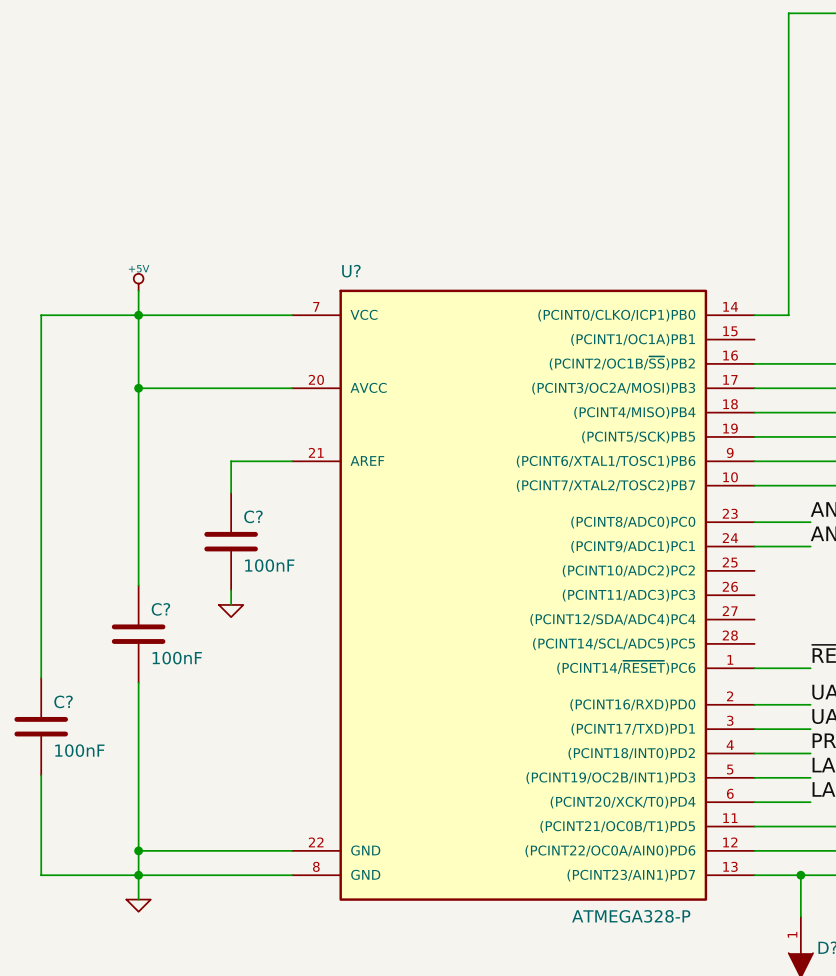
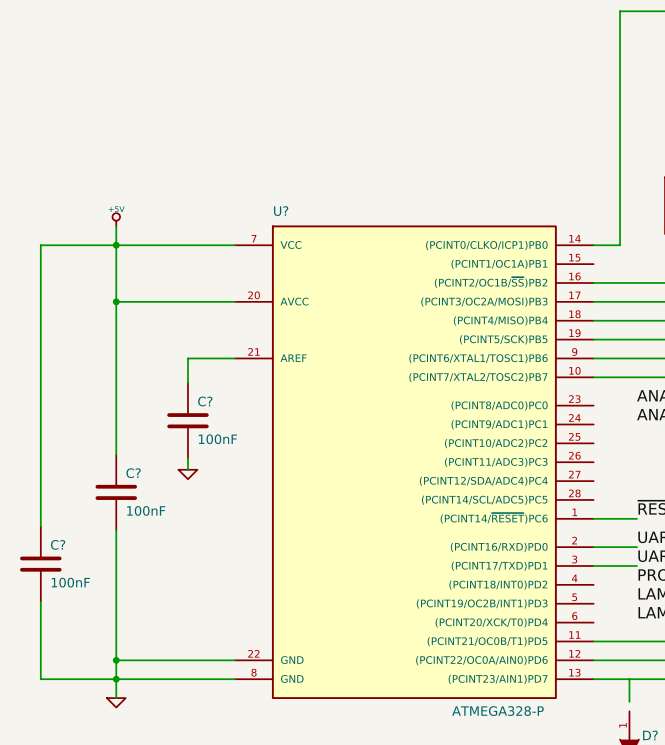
wire: (754, 522) (810, 522) -> none
wire: (754, 546) (810, 546) -> none
wire: (754, 753) (810, 753) -> none
wire: (754, 777) (810, 777) -> none
wire: (754, 802) (810, 802) -> none
junction: (800, 875) -> none
wire: (800, 904) (800, 916) -> none

